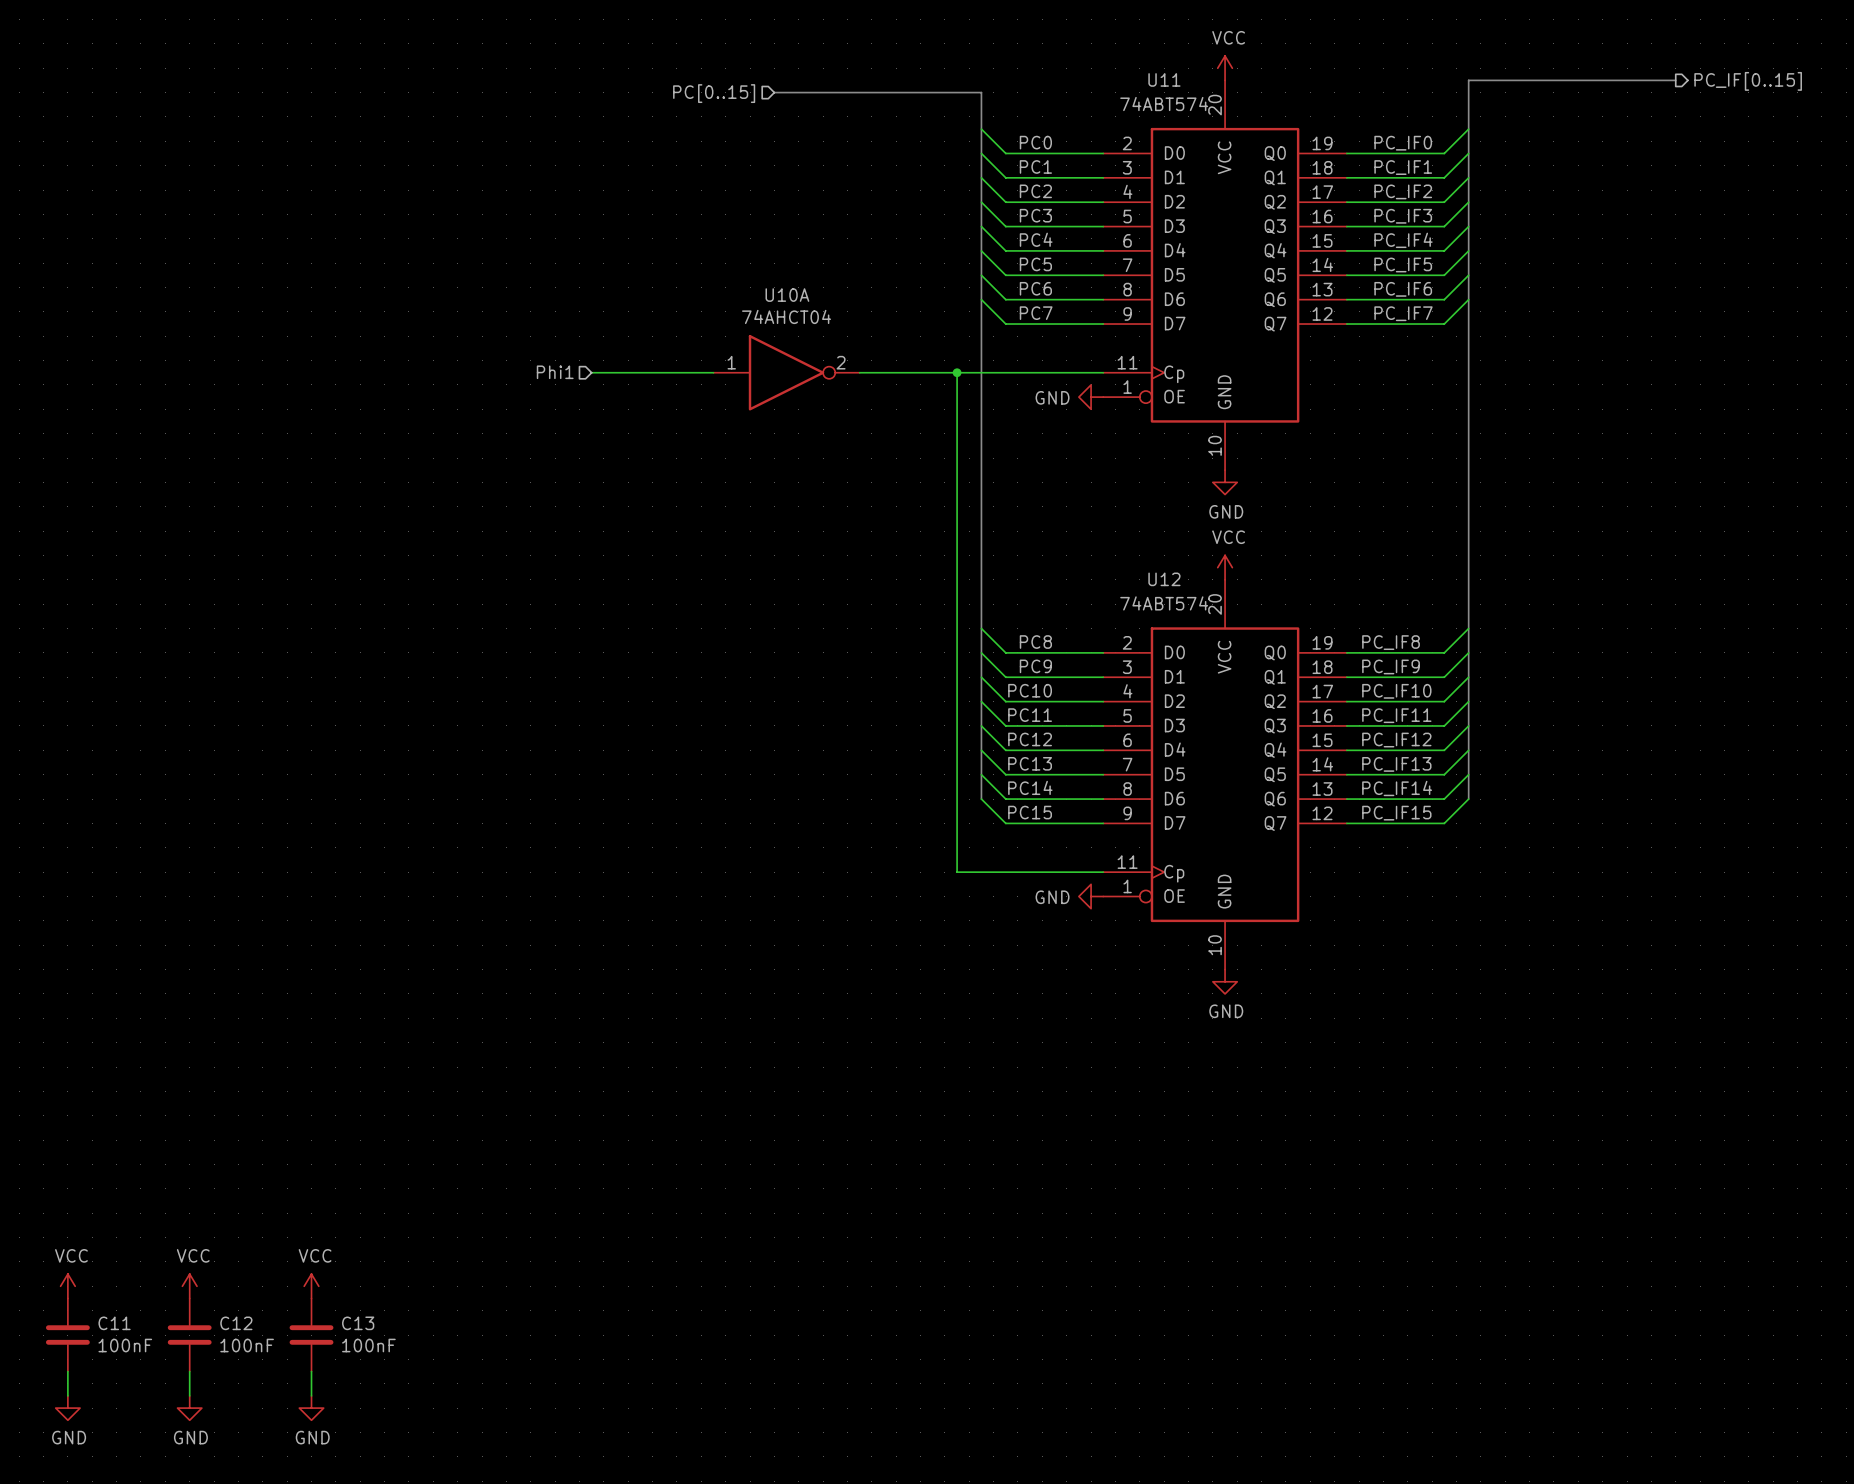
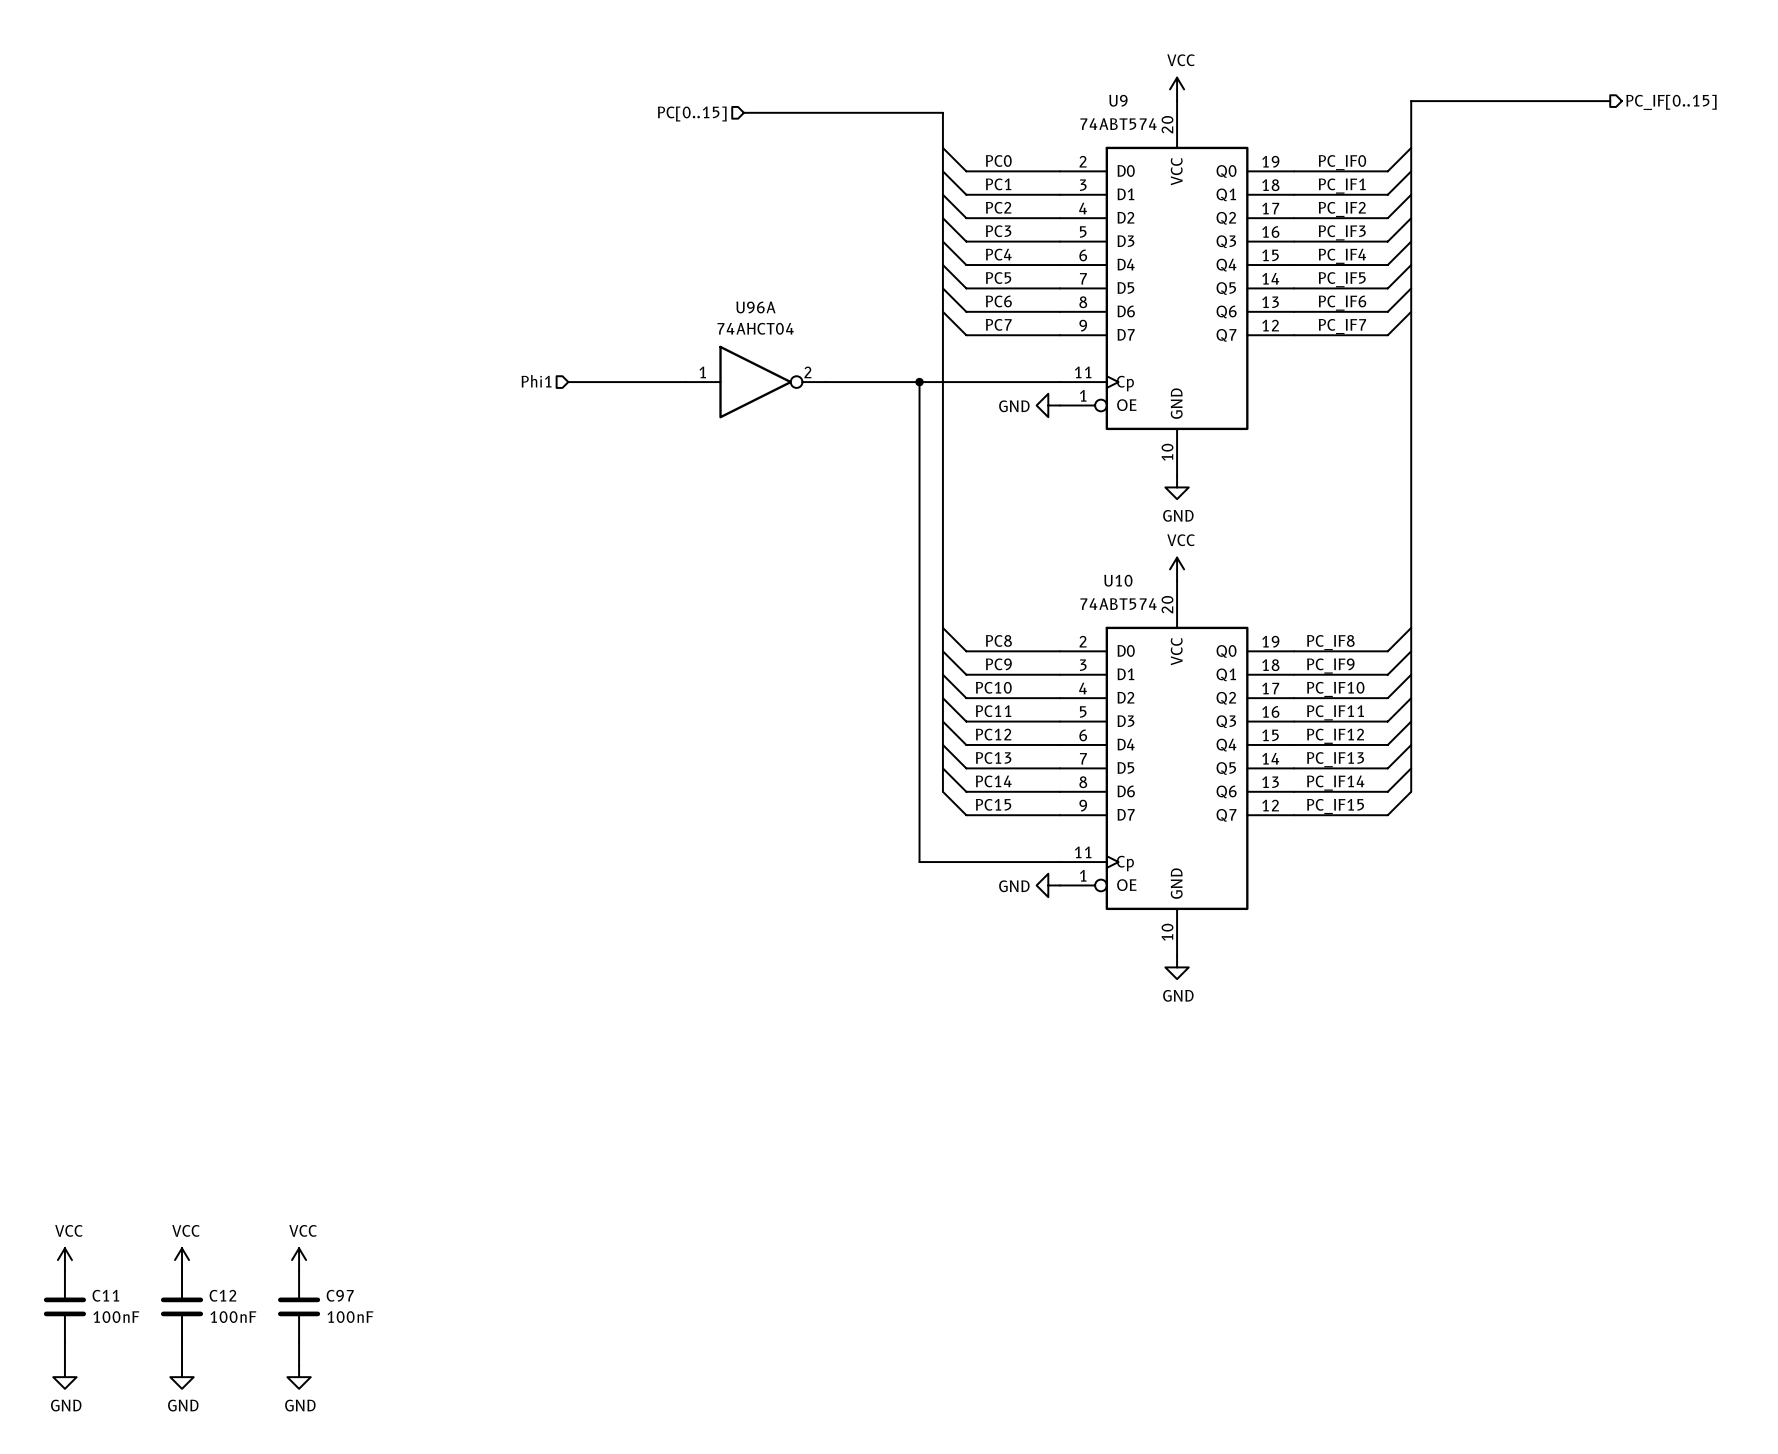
U11 name: U11 (1164, 79) -> U9 (1118, 100)
U10A name: U10A (787, 295) -> U96A (755, 307)
U12 name: U12 (1164, 579) -> U10 (1118, 580)
C13 name: C13 (358, 1323) -> C97 (340, 1295)

